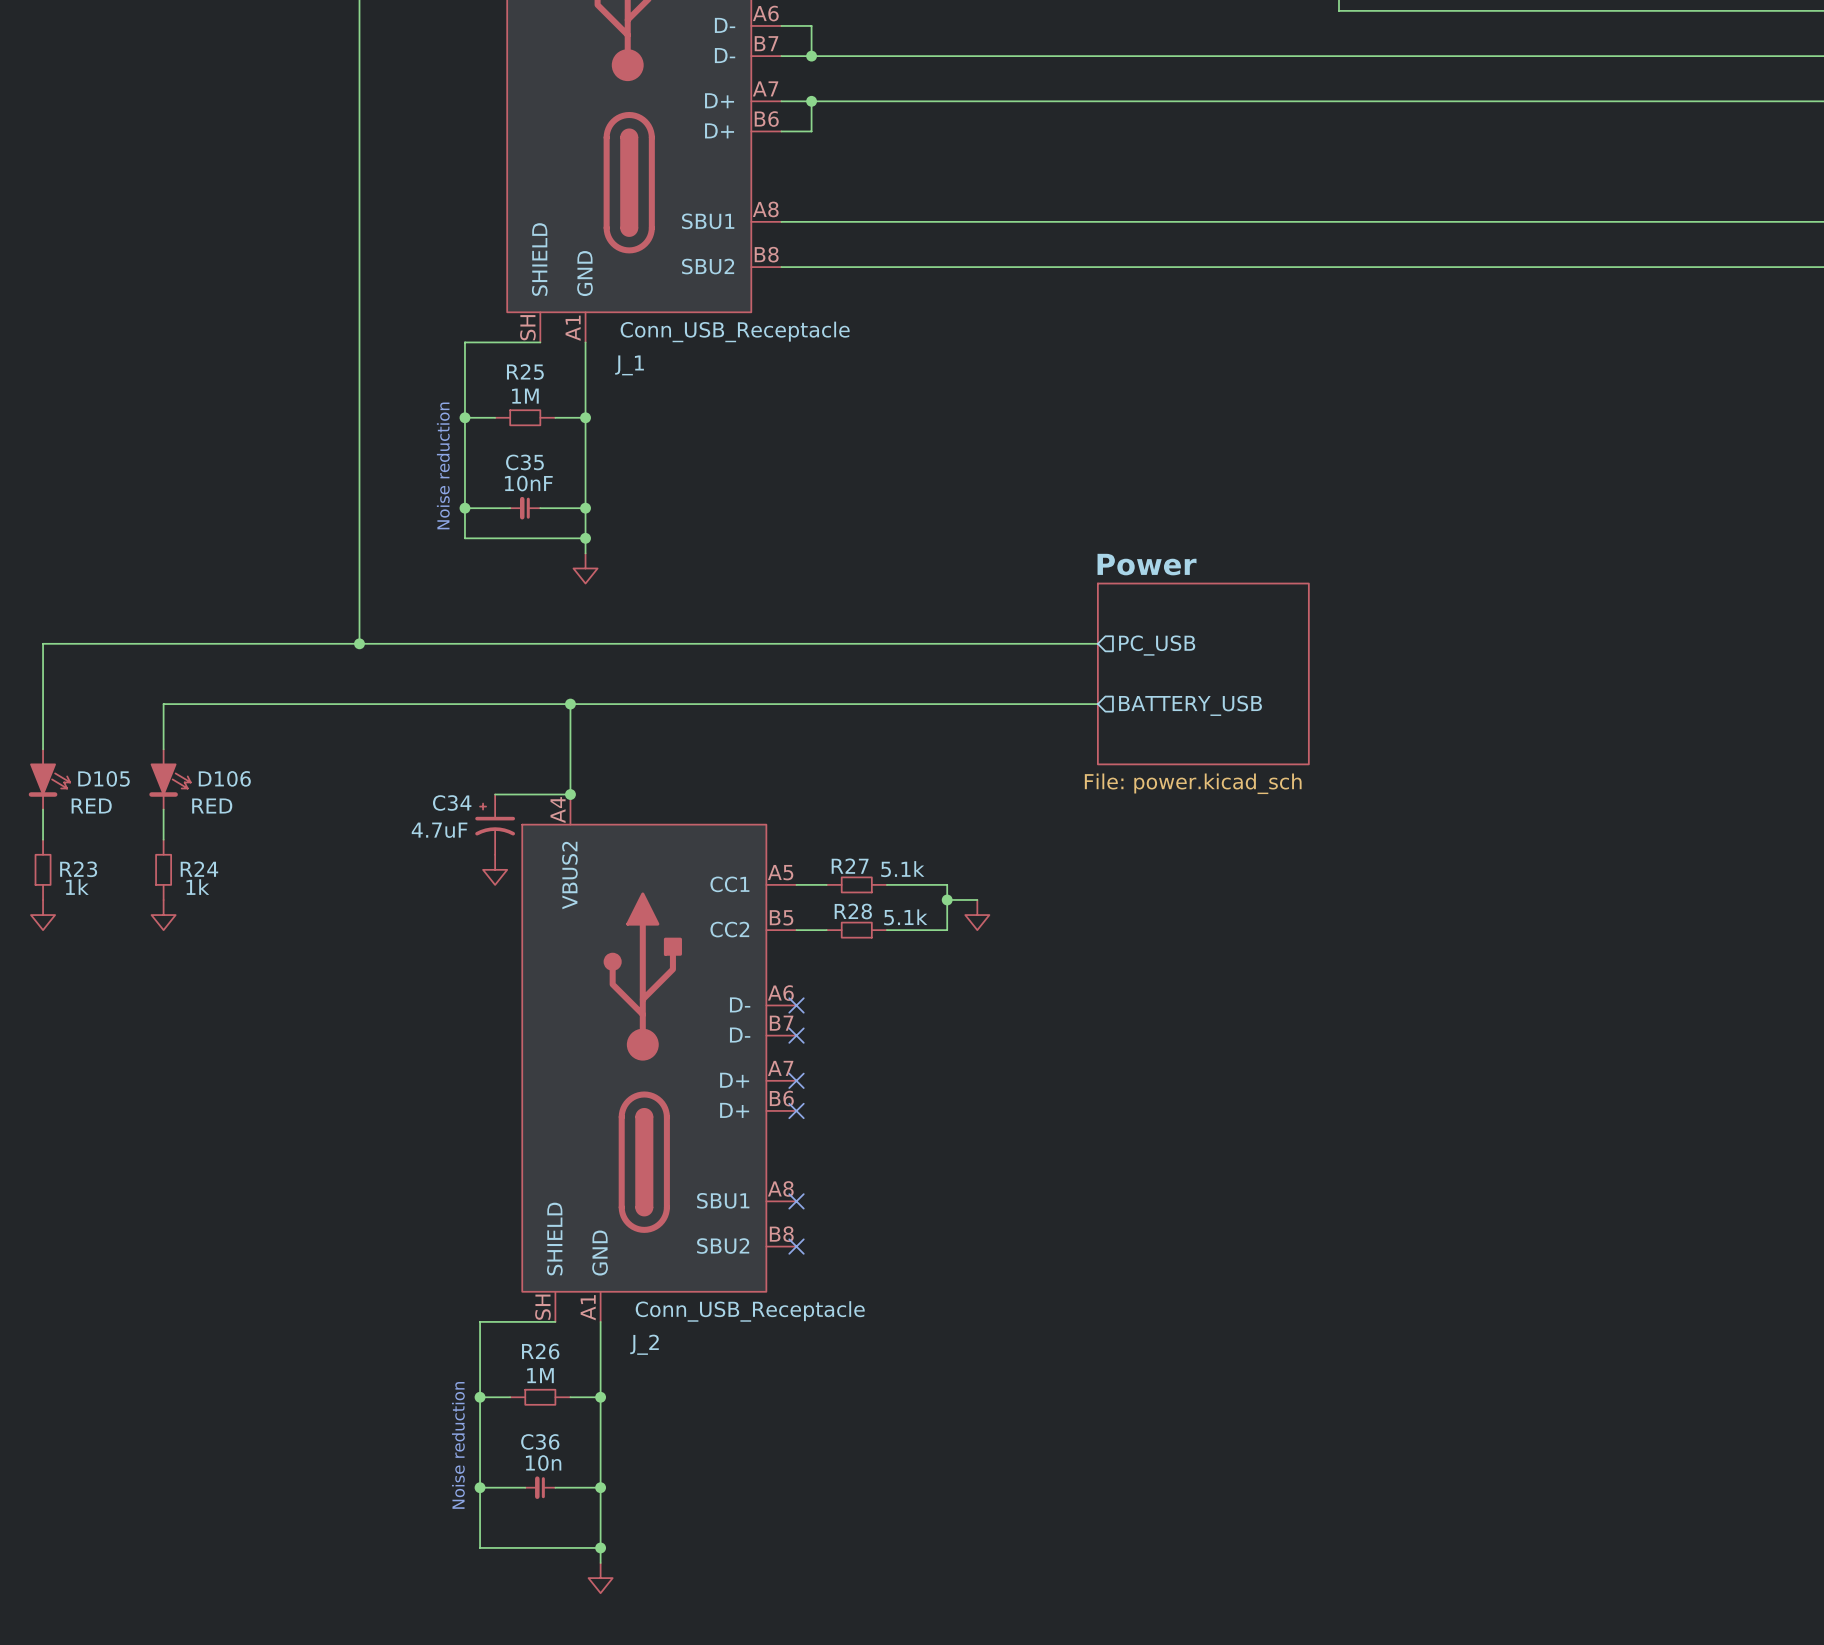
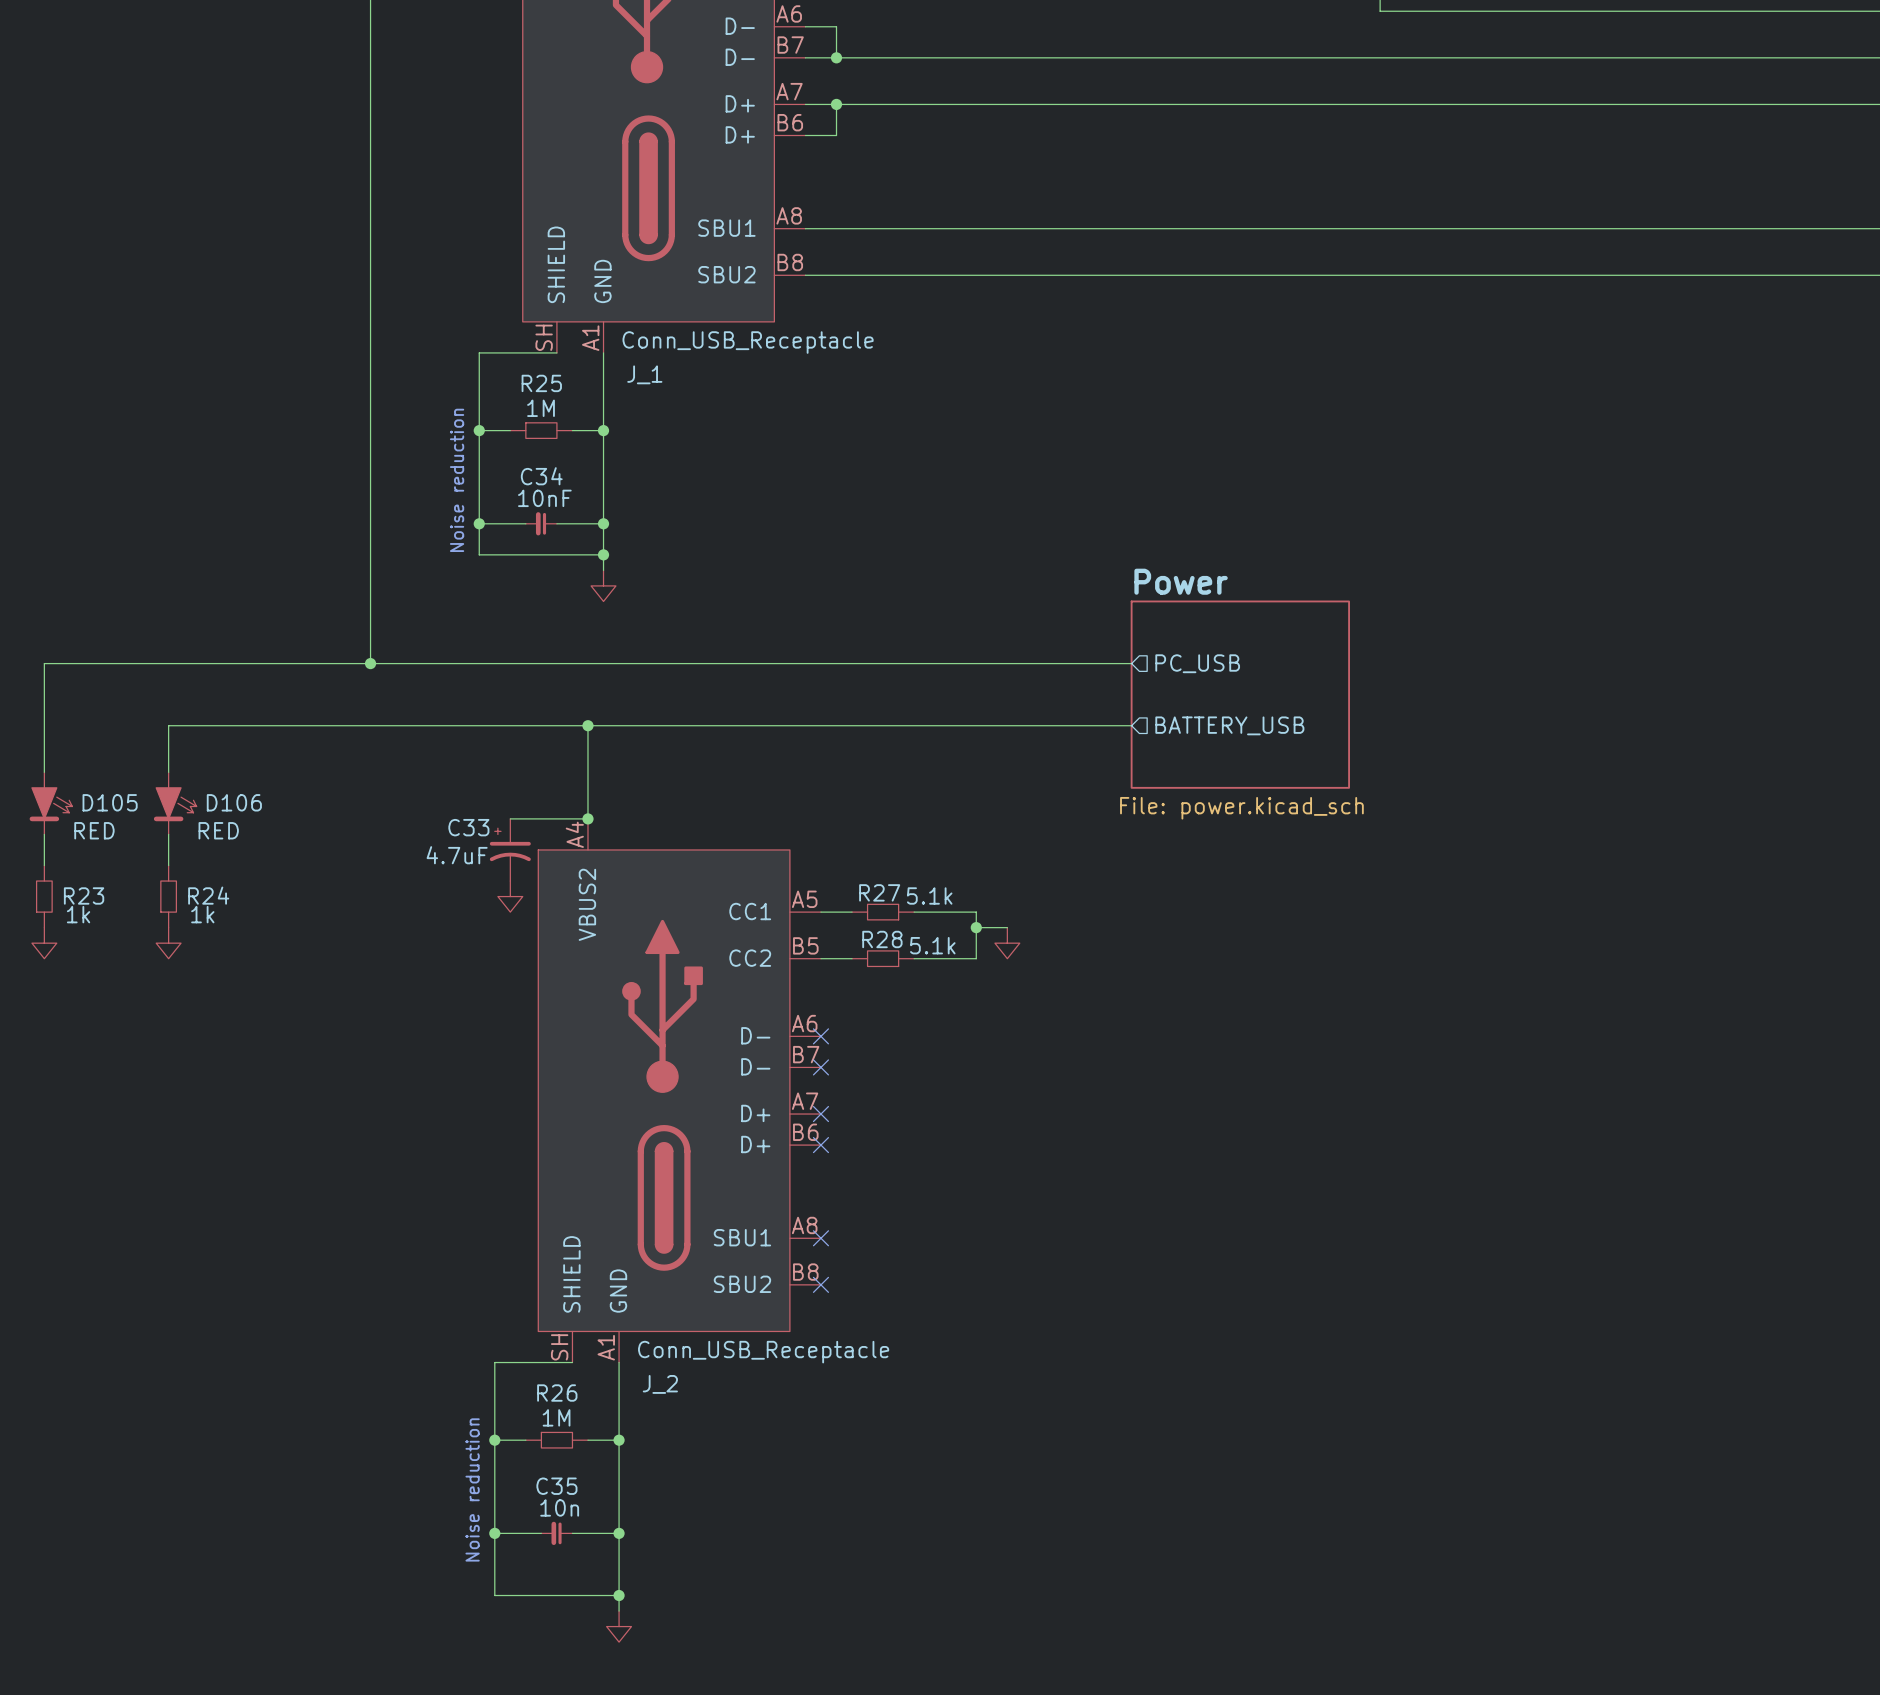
C35 name: C35 (524, 462) -> C34 (541, 476)
C34 name: C34 (452, 802) -> C33 (468, 827)
C36 name: C36 (540, 1441) -> C35 (556, 1486)

